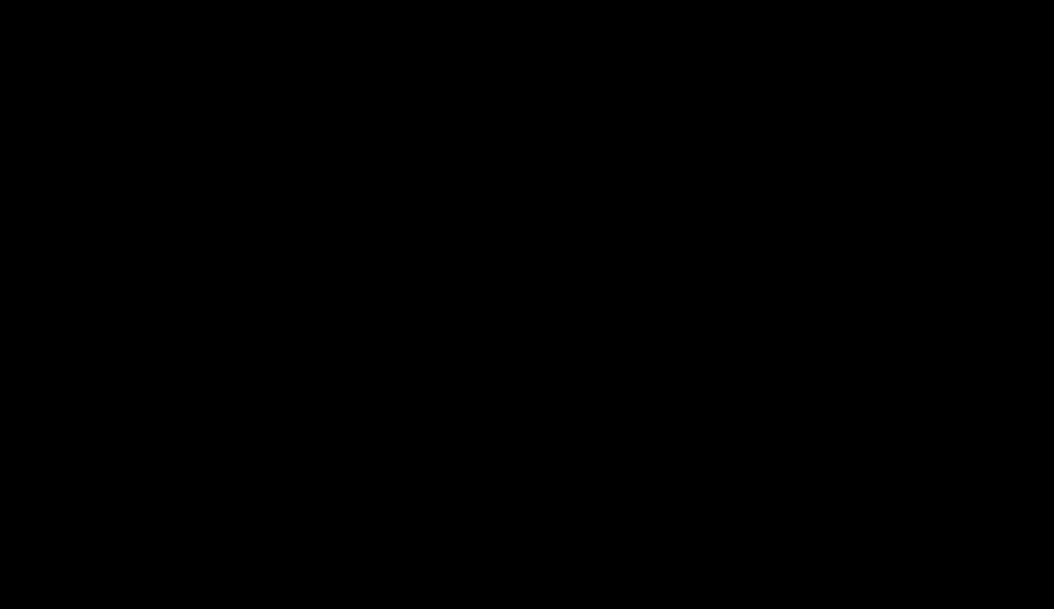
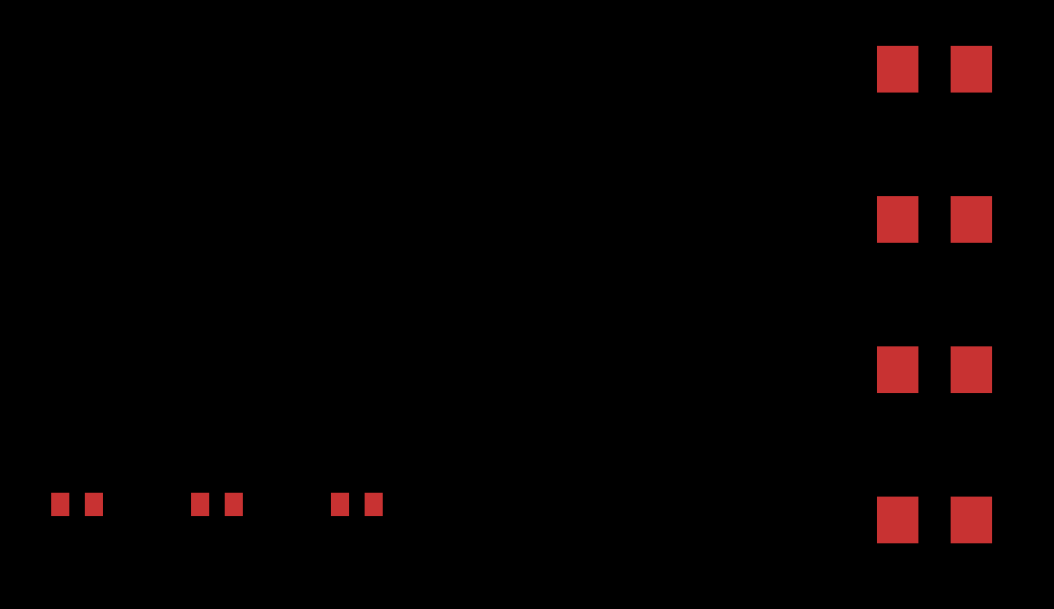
part: none -> (934, 69)
part: none -> (934, 219)
part: none -> (934, 369)
part: none -> (77, 504)
part: none -> (216, 504)
part: none -> (356, 504)
part: none -> (934, 519)

